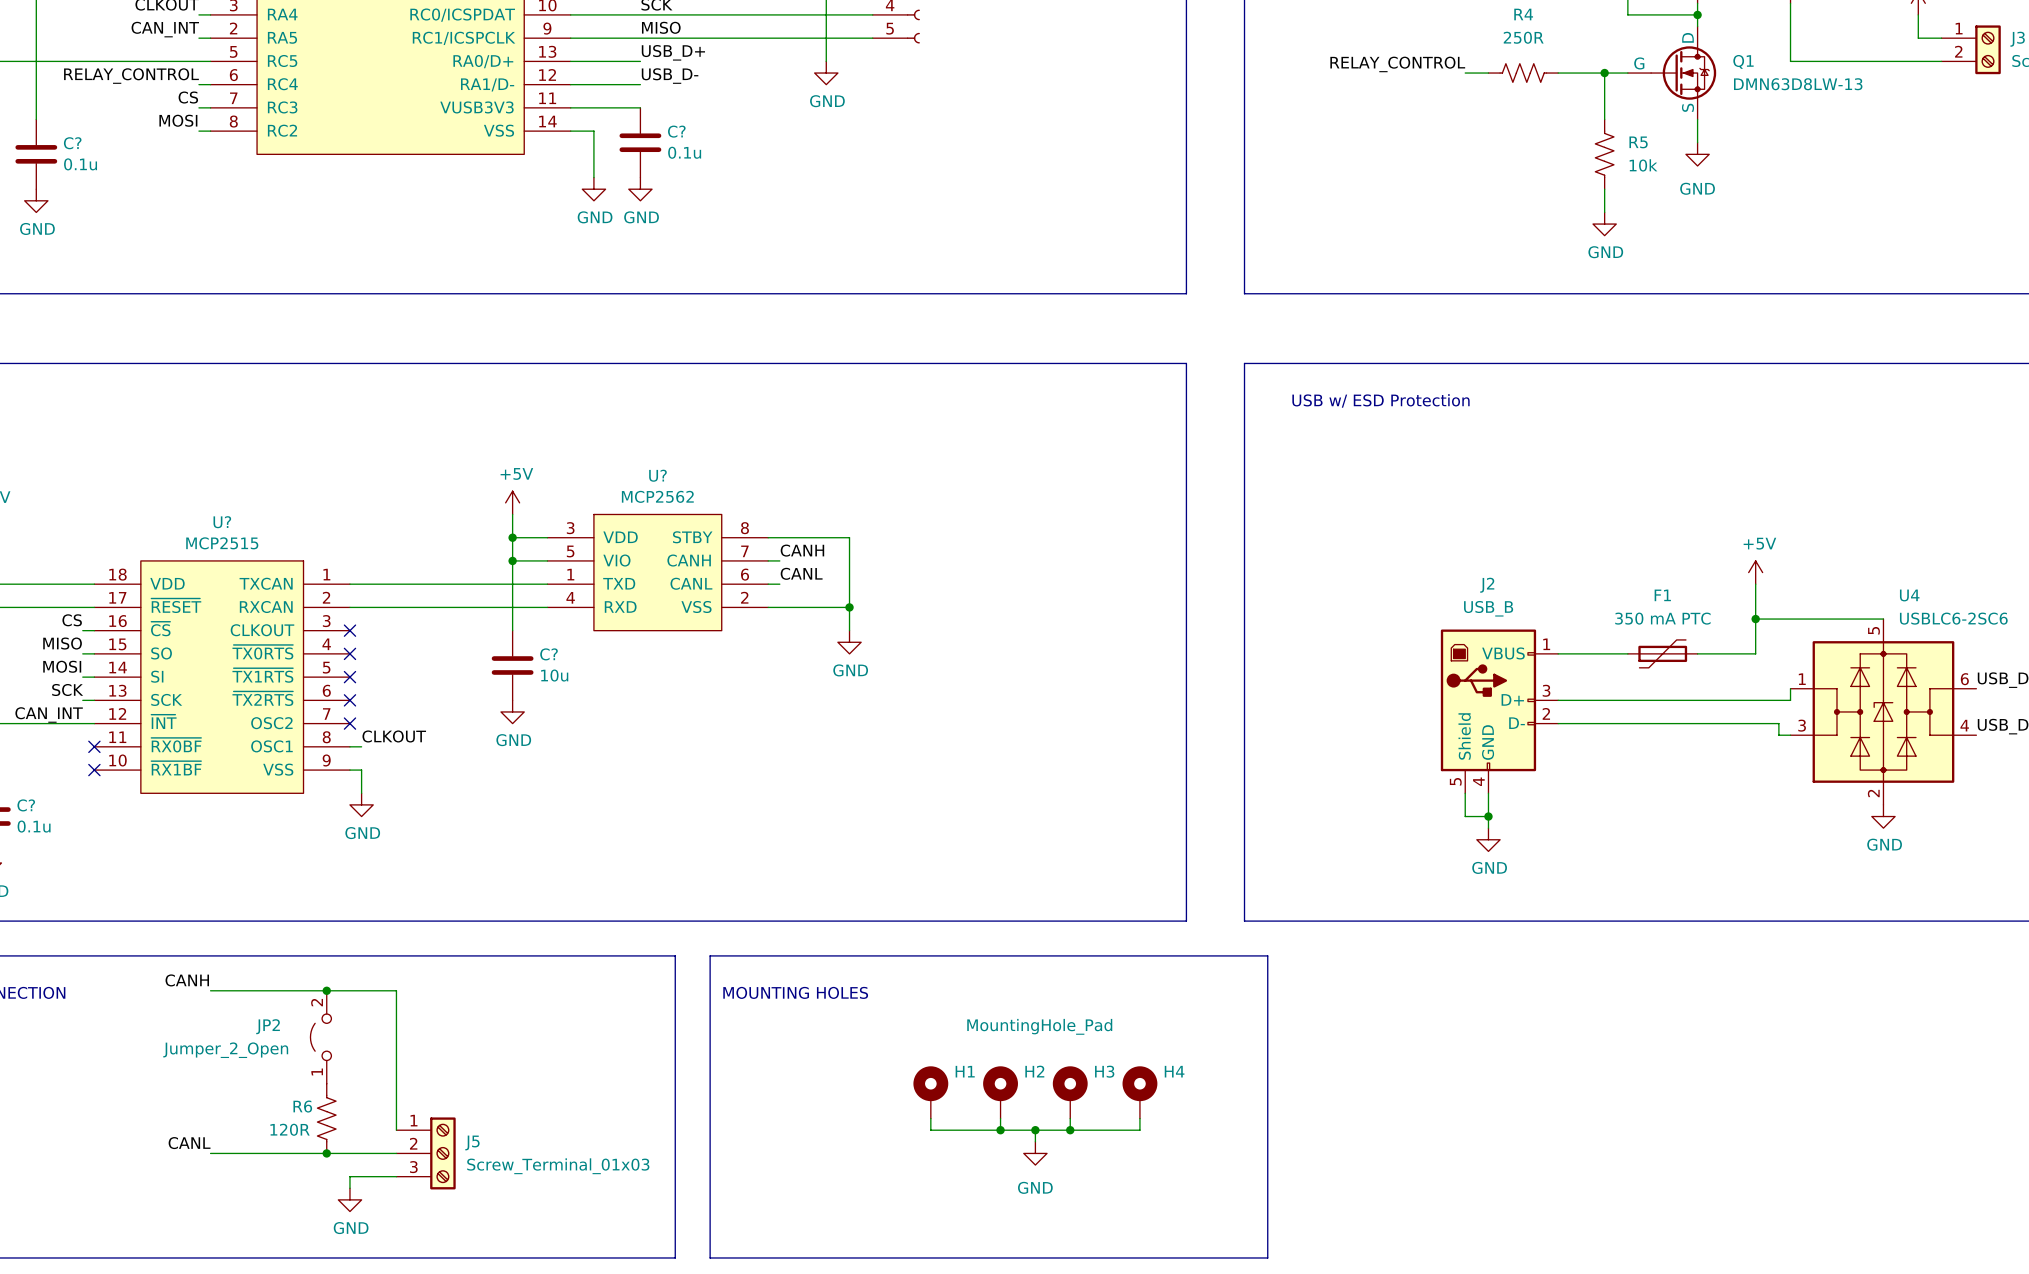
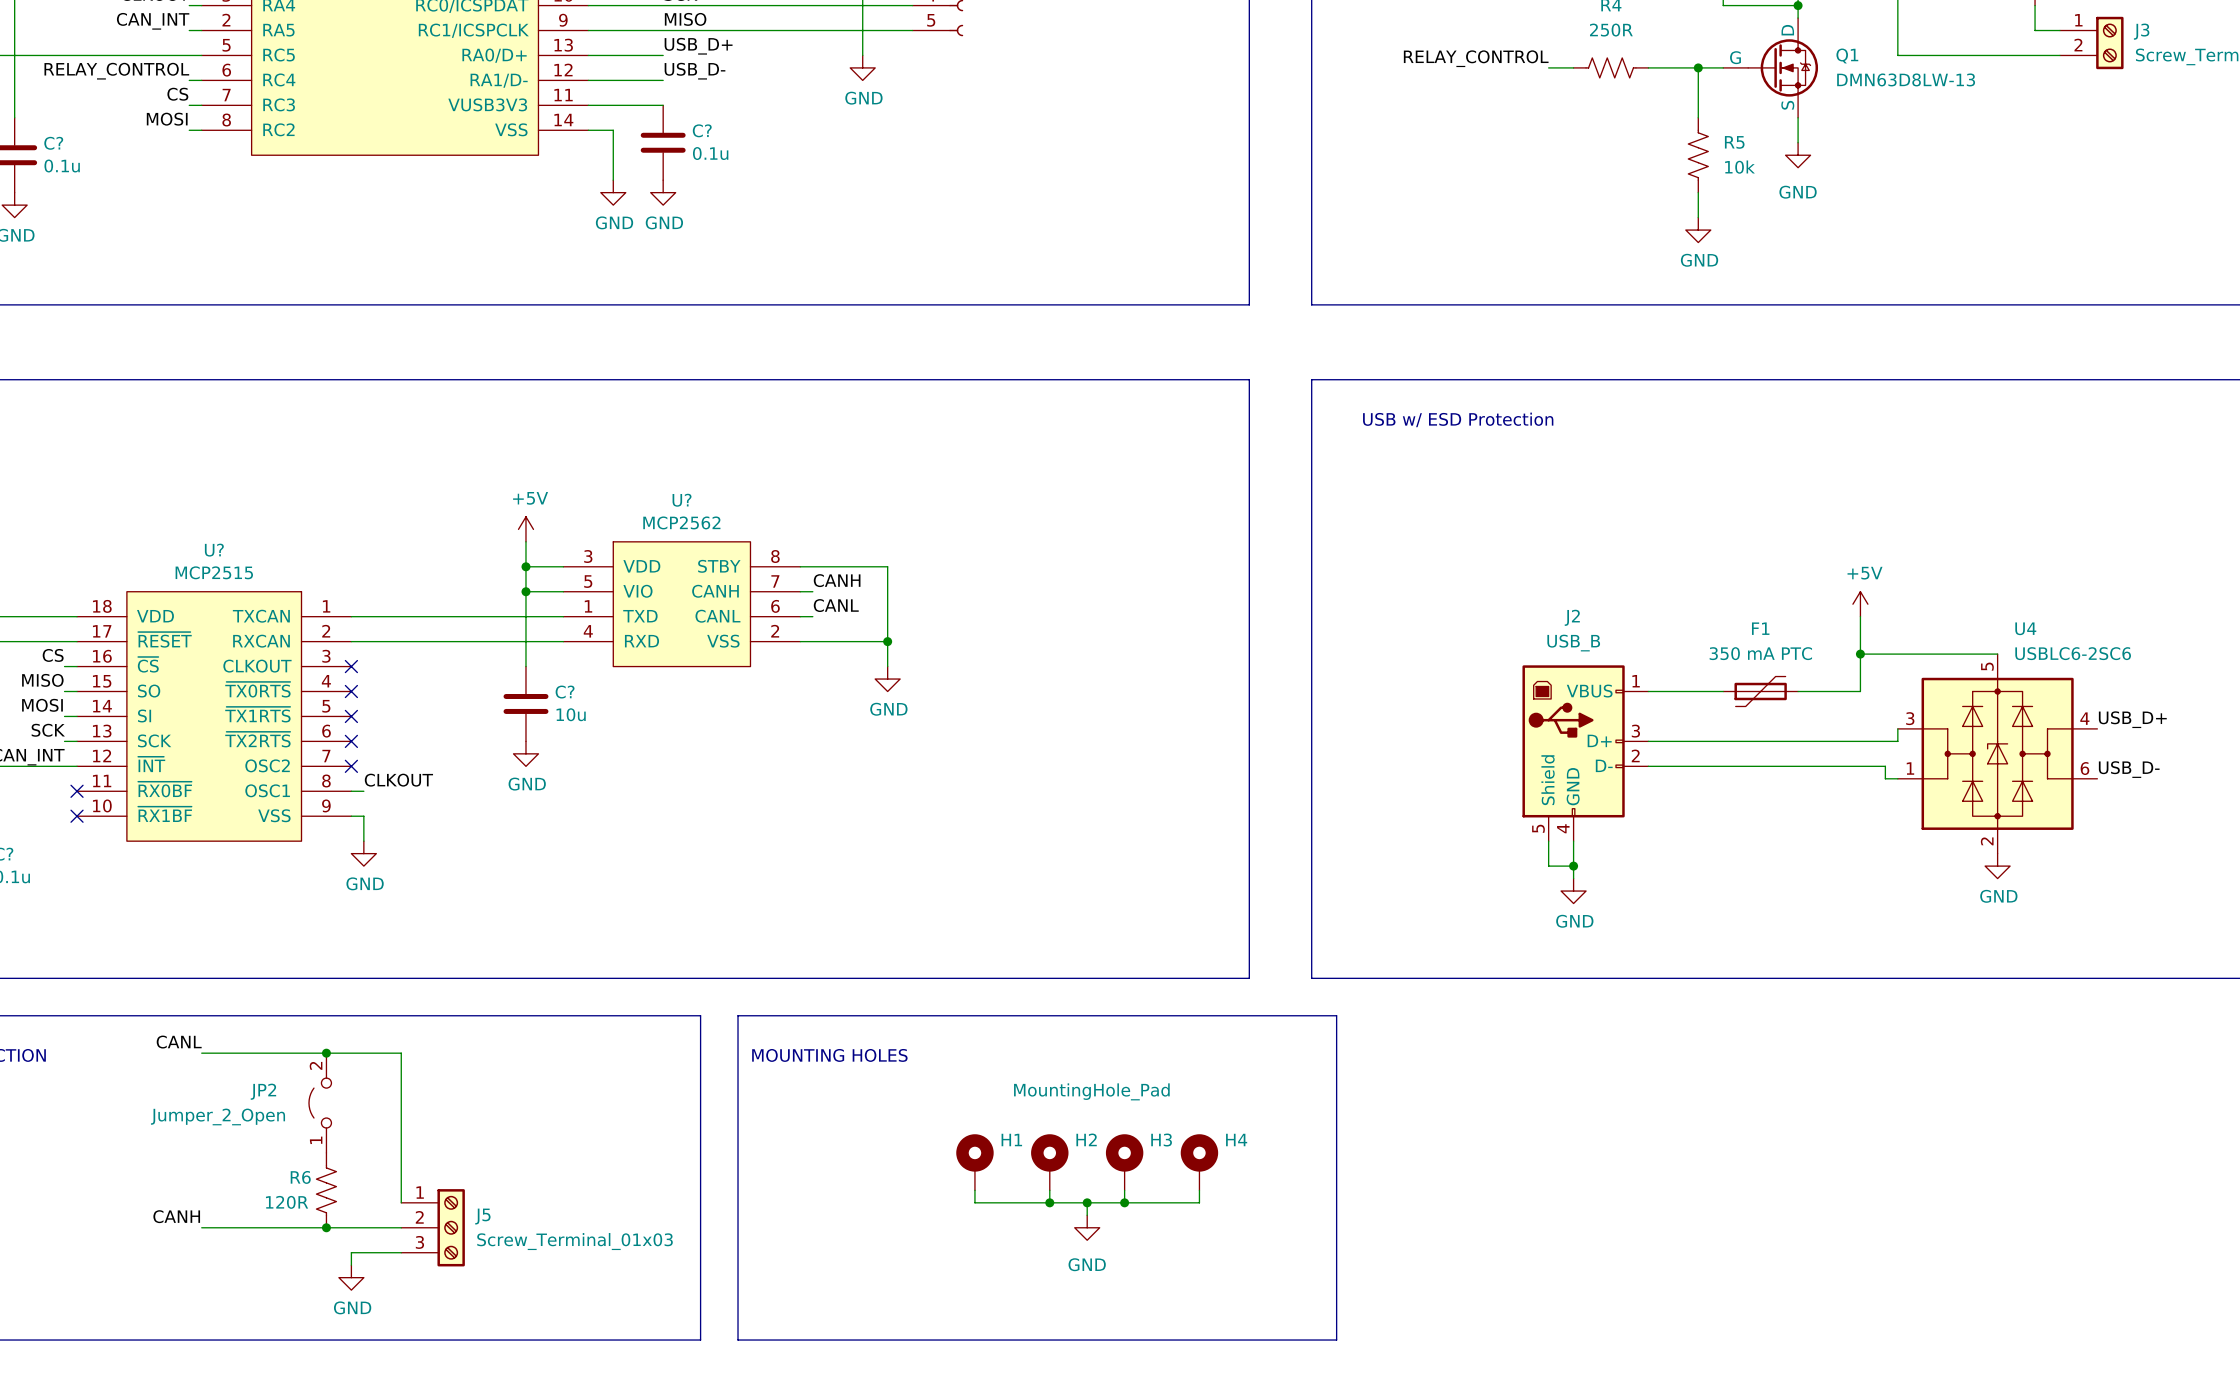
U4 pin number: 1 (1802, 679) -> 3 (1910, 718)
U4 pin number: 6 (1964, 679) -> 4 (2084, 718)
U4 pin number: 3 (1802, 725) -> 1 (1910, 768)
U4 pin number: 4 (1964, 725) -> 6 (2084, 768)
label: CANH (187, 980) -> CANL (179, 1042)
label: CANL (189, 1143) -> CANH (176, 1216)

